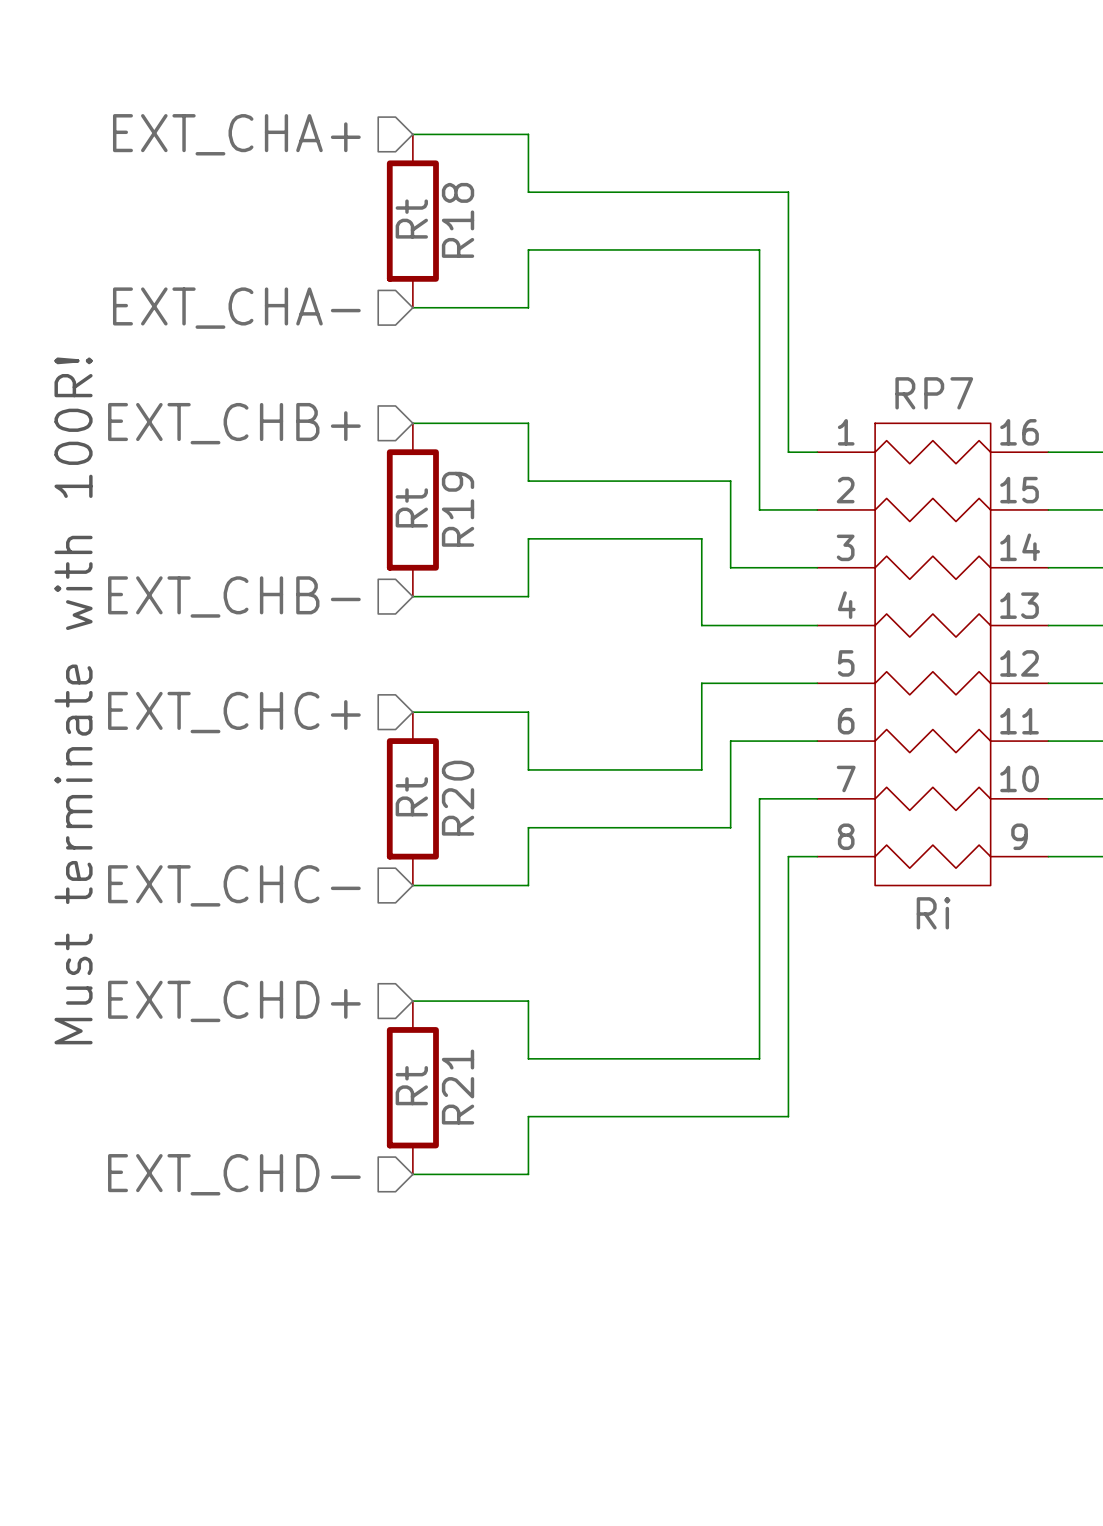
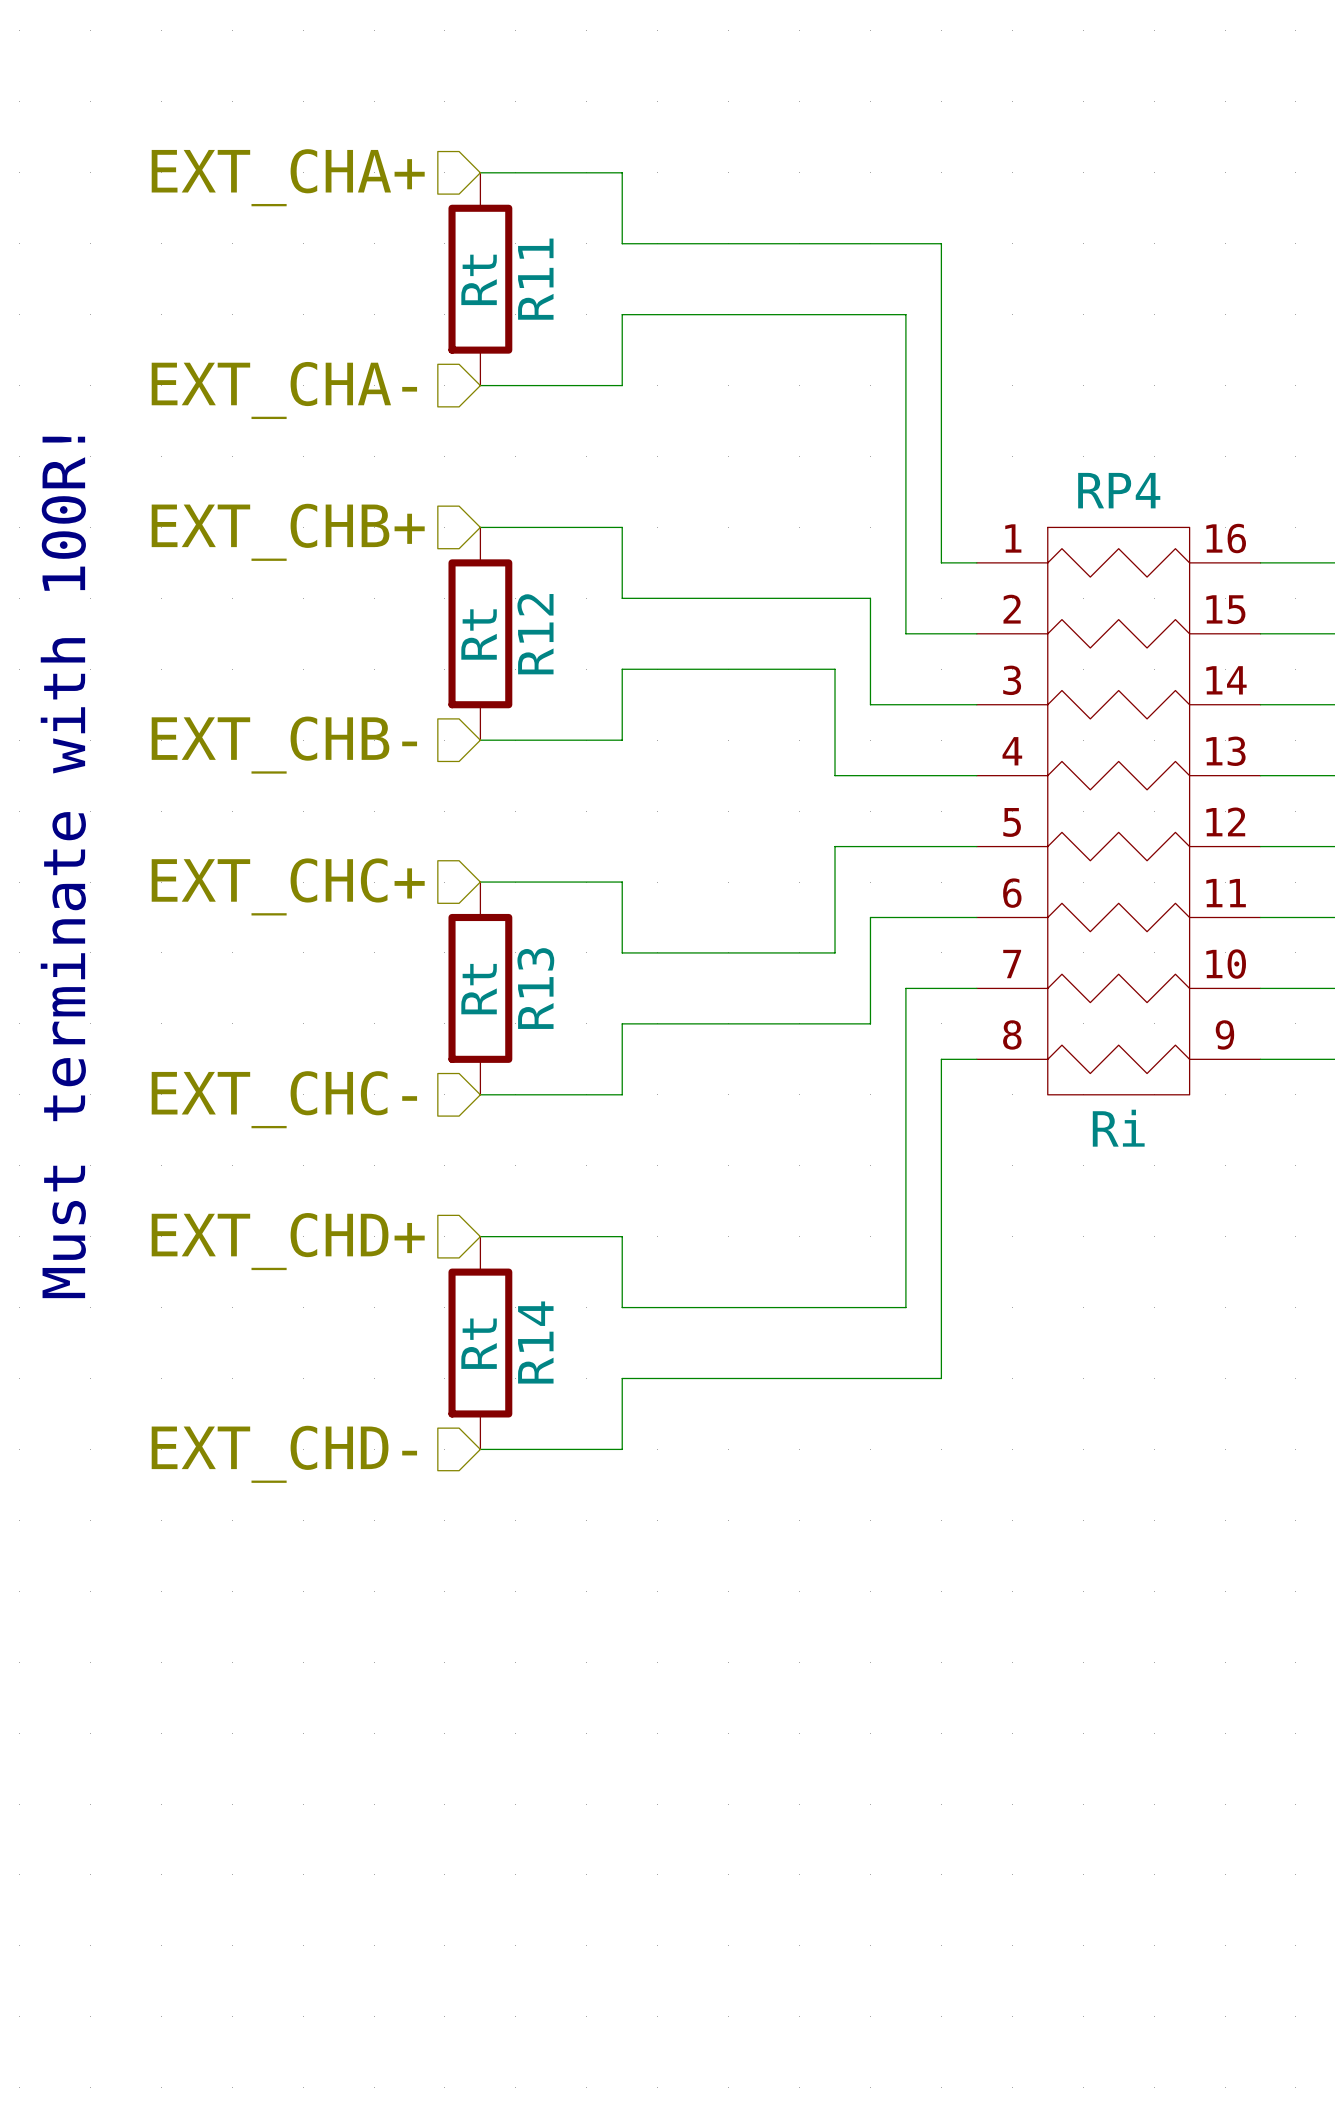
R18 name: R18 (458, 220) -> R11 (535, 279)
RP7 name: RP7 (934, 393) -> RP4 (1119, 490)
R19 name: R19 (458, 509) -> R12 (535, 634)
R20 name: R20 (458, 798) -> R13 (535, 988)
R21 name: R21 (458, 1087) -> R14 (535, 1342)

